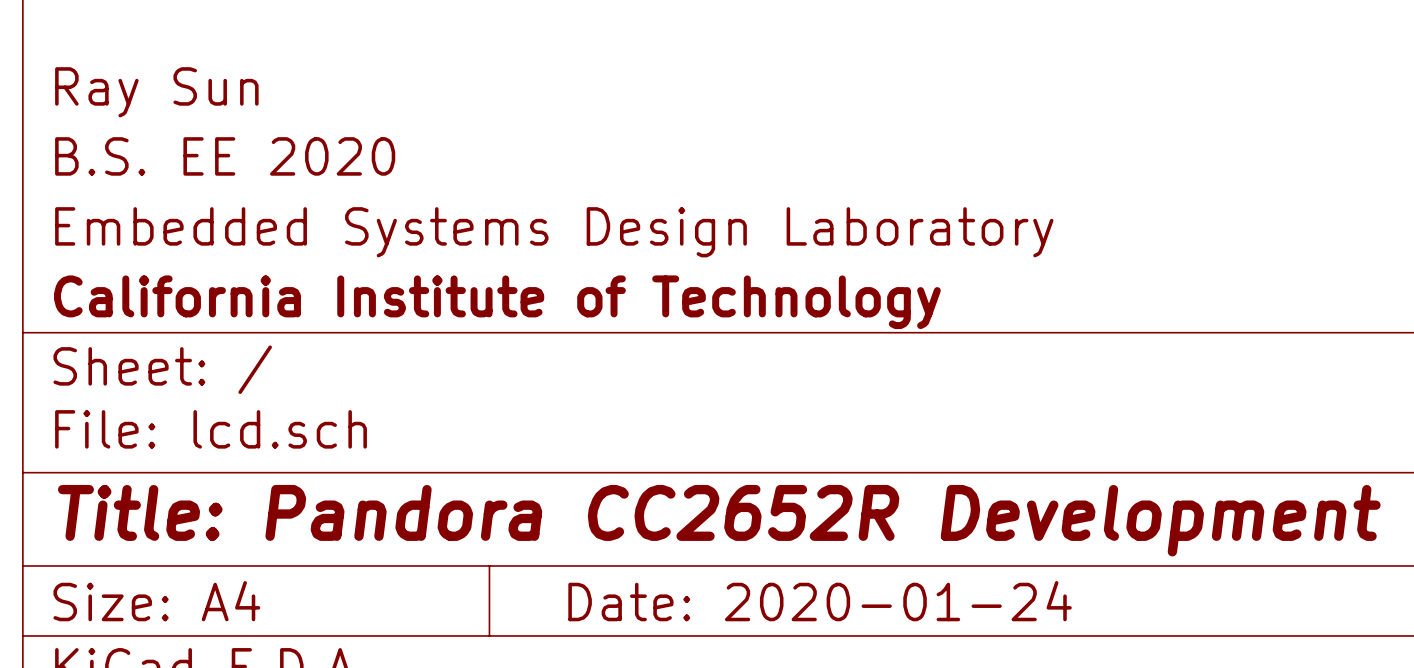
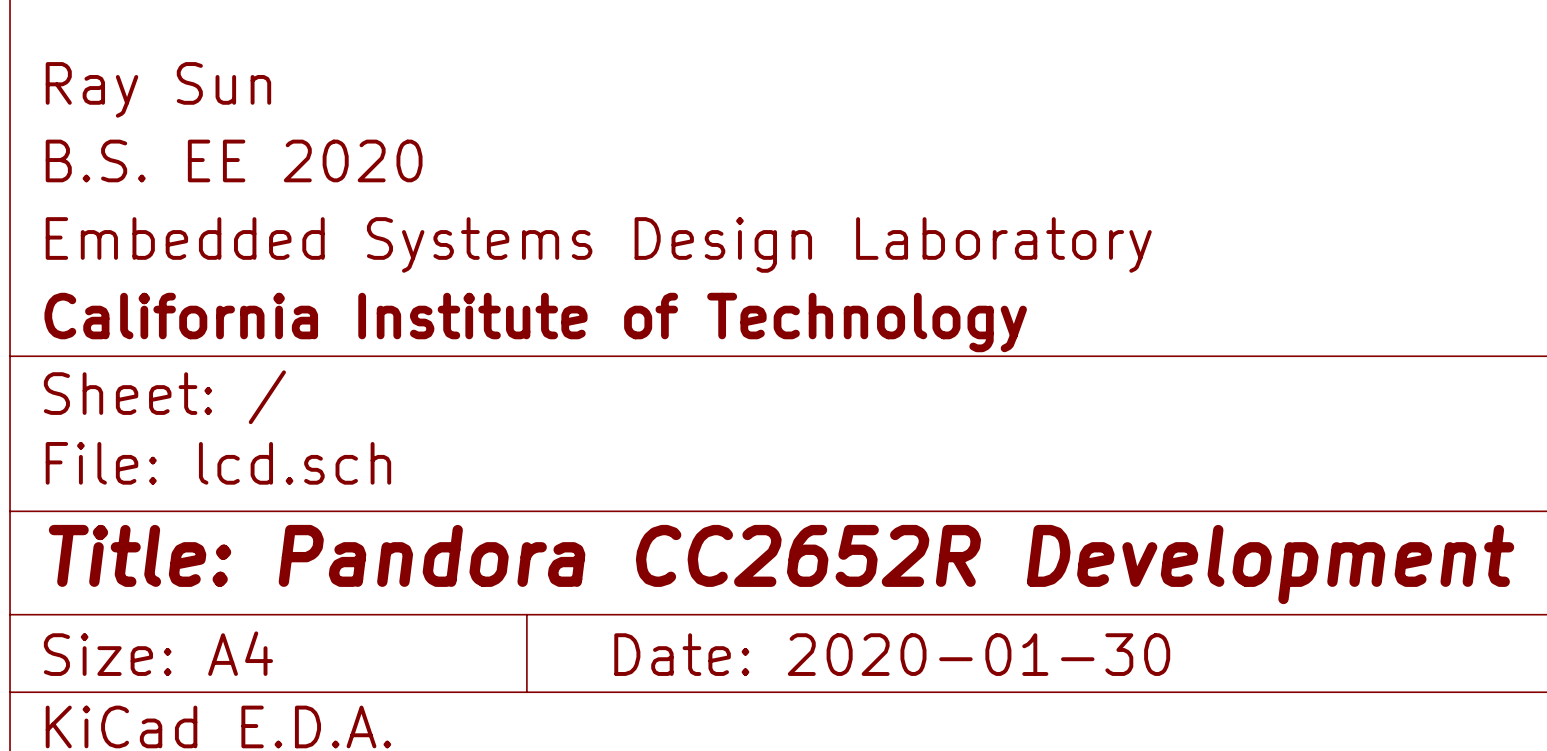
title block: Date: 2020-01-24 (820, 601) -> Date: 2020-01-30 (892, 654)

